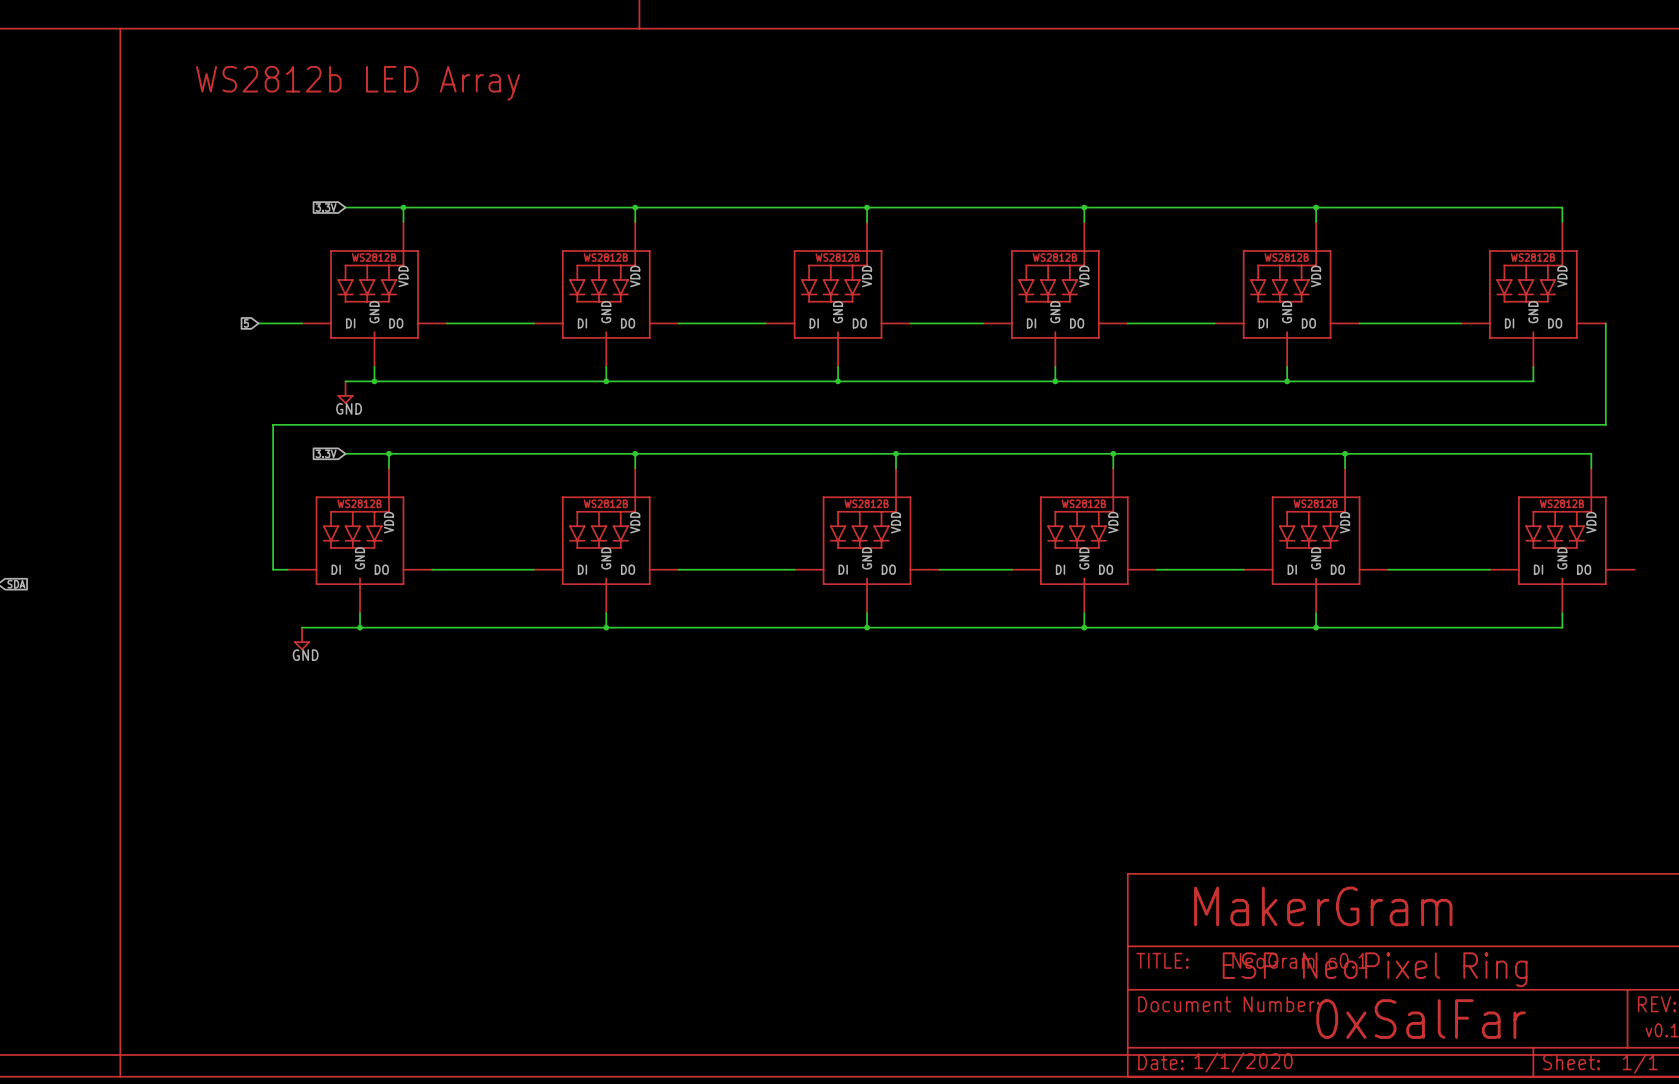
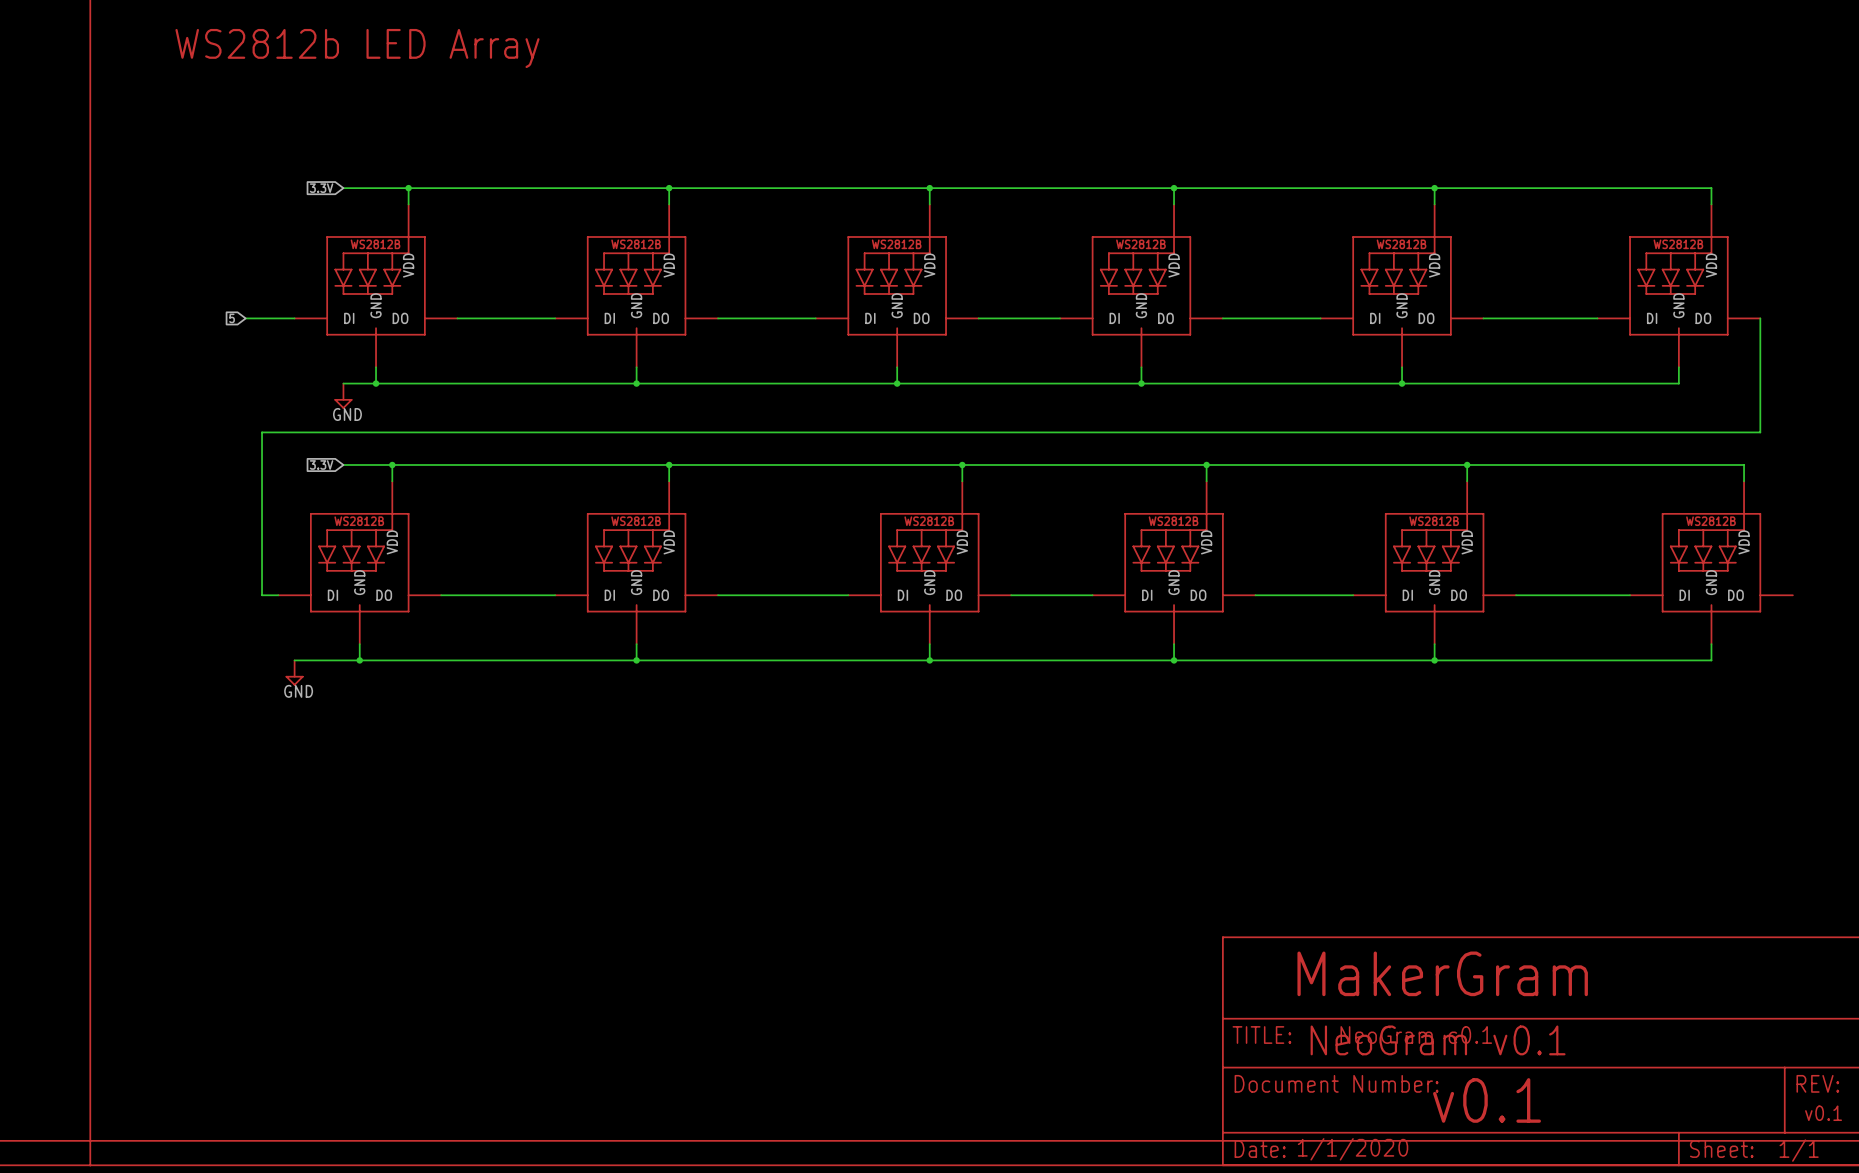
text: ESP NeoPixel Ring (1375, 969) -> NeoGram v0.1 (1438, 1040)
text: 0xSalFar (1421, 1019) -> v0.1 (1487, 1100)

